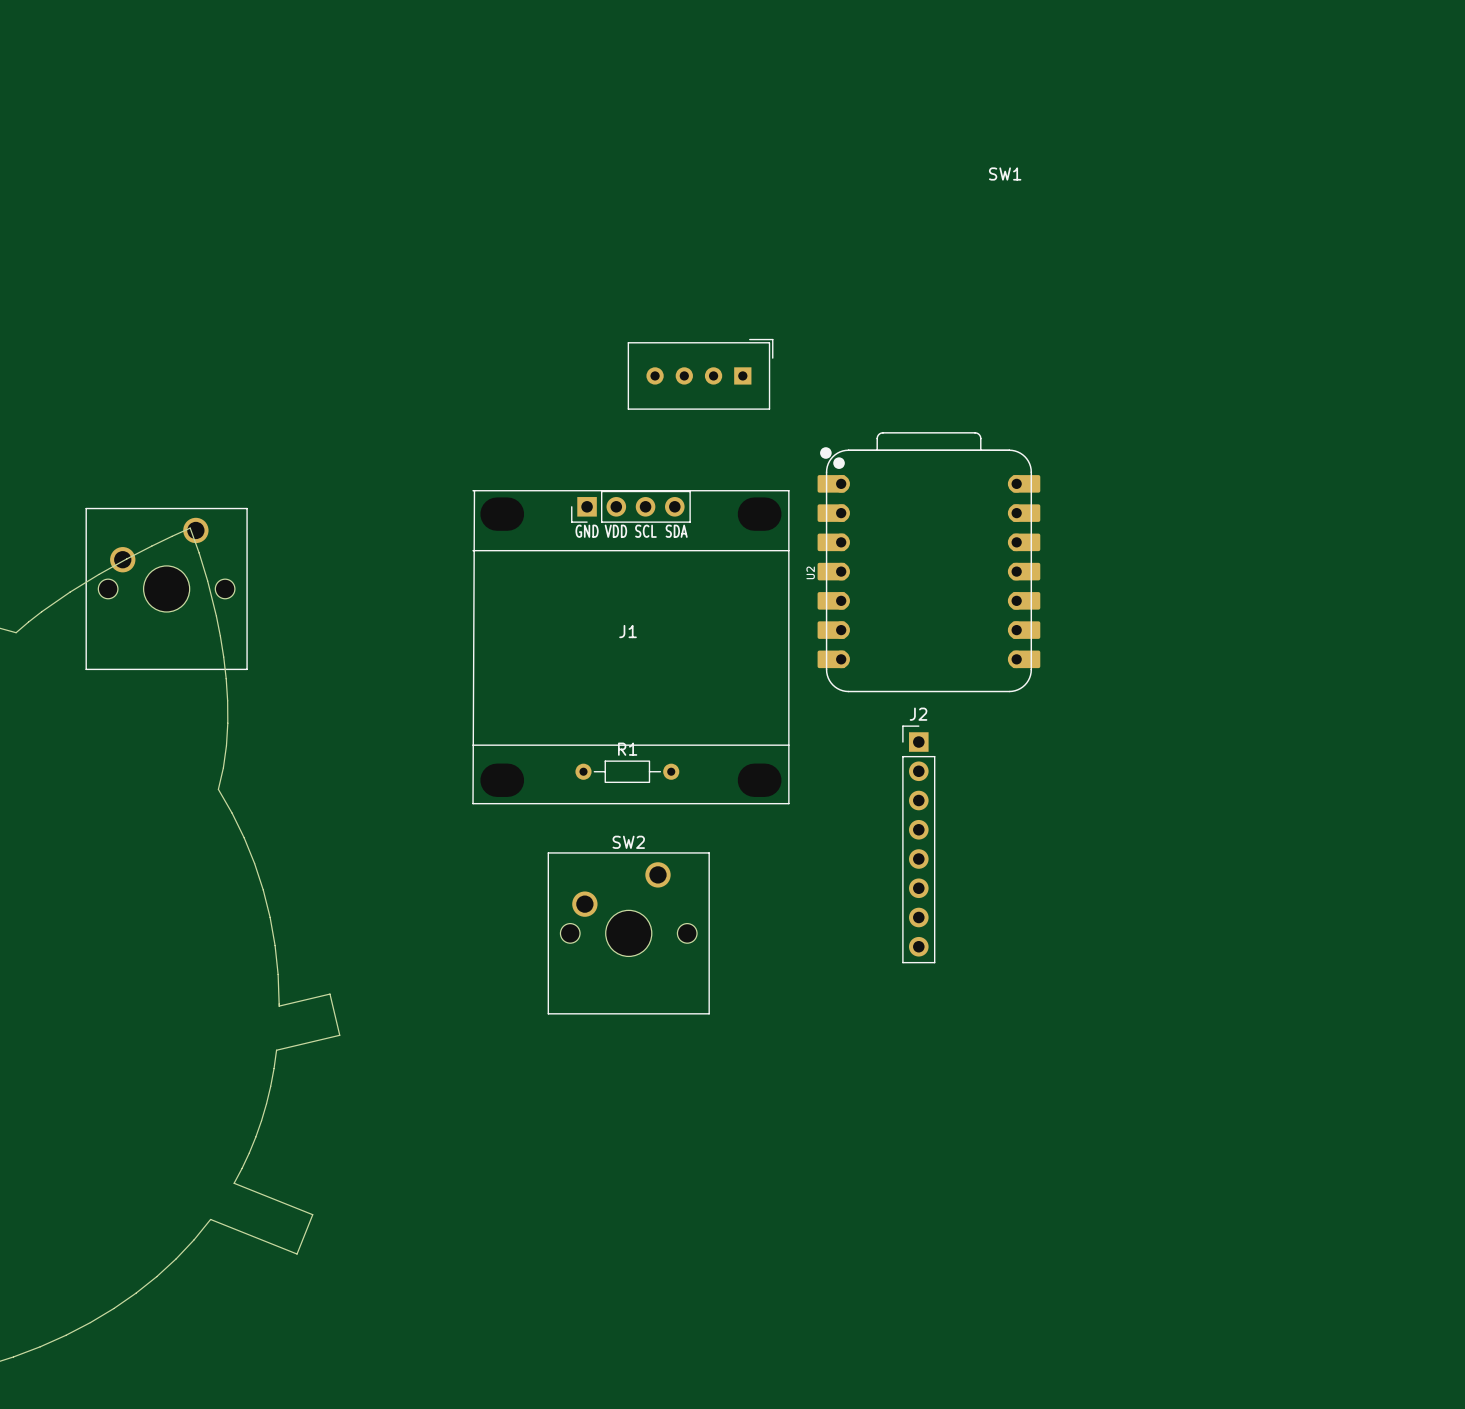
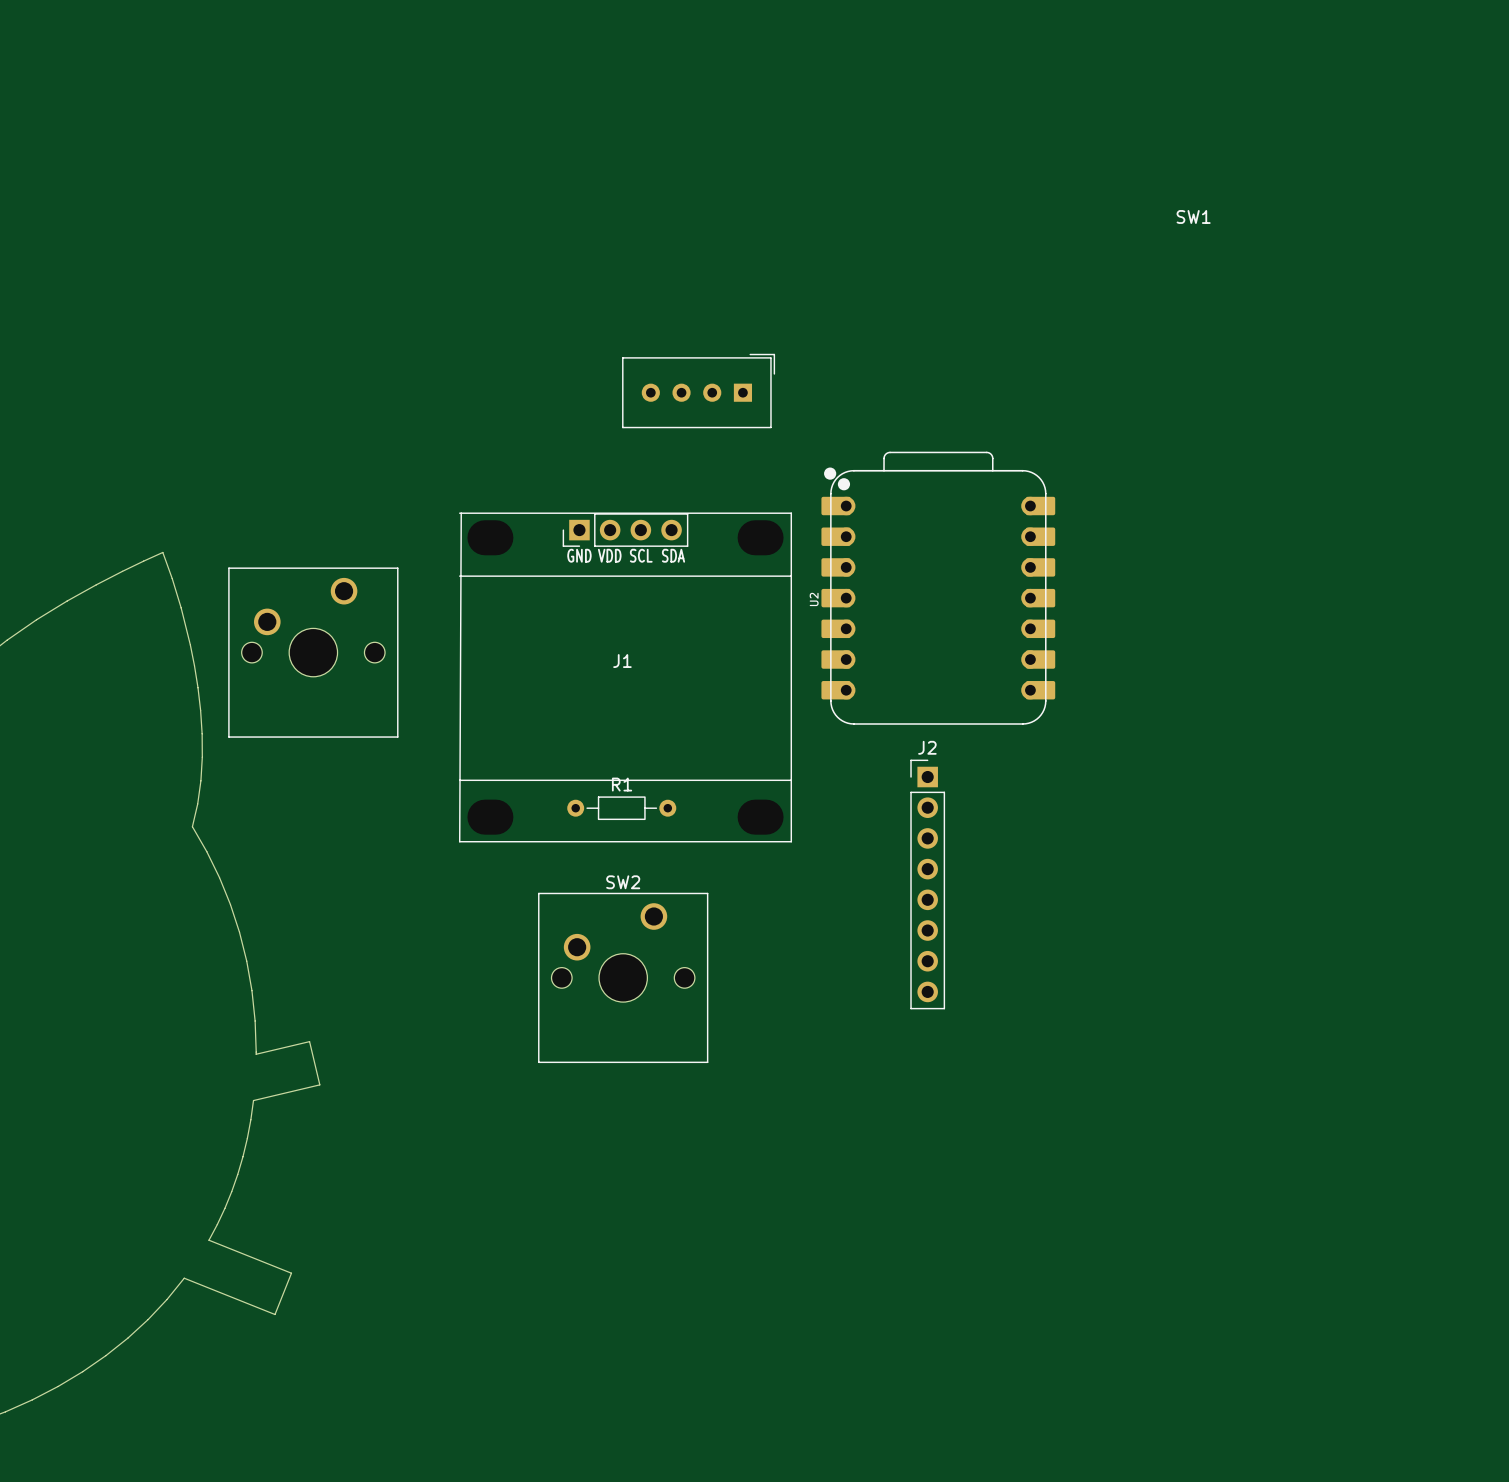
SW1 position: (166, 588) -> (313, 652)

